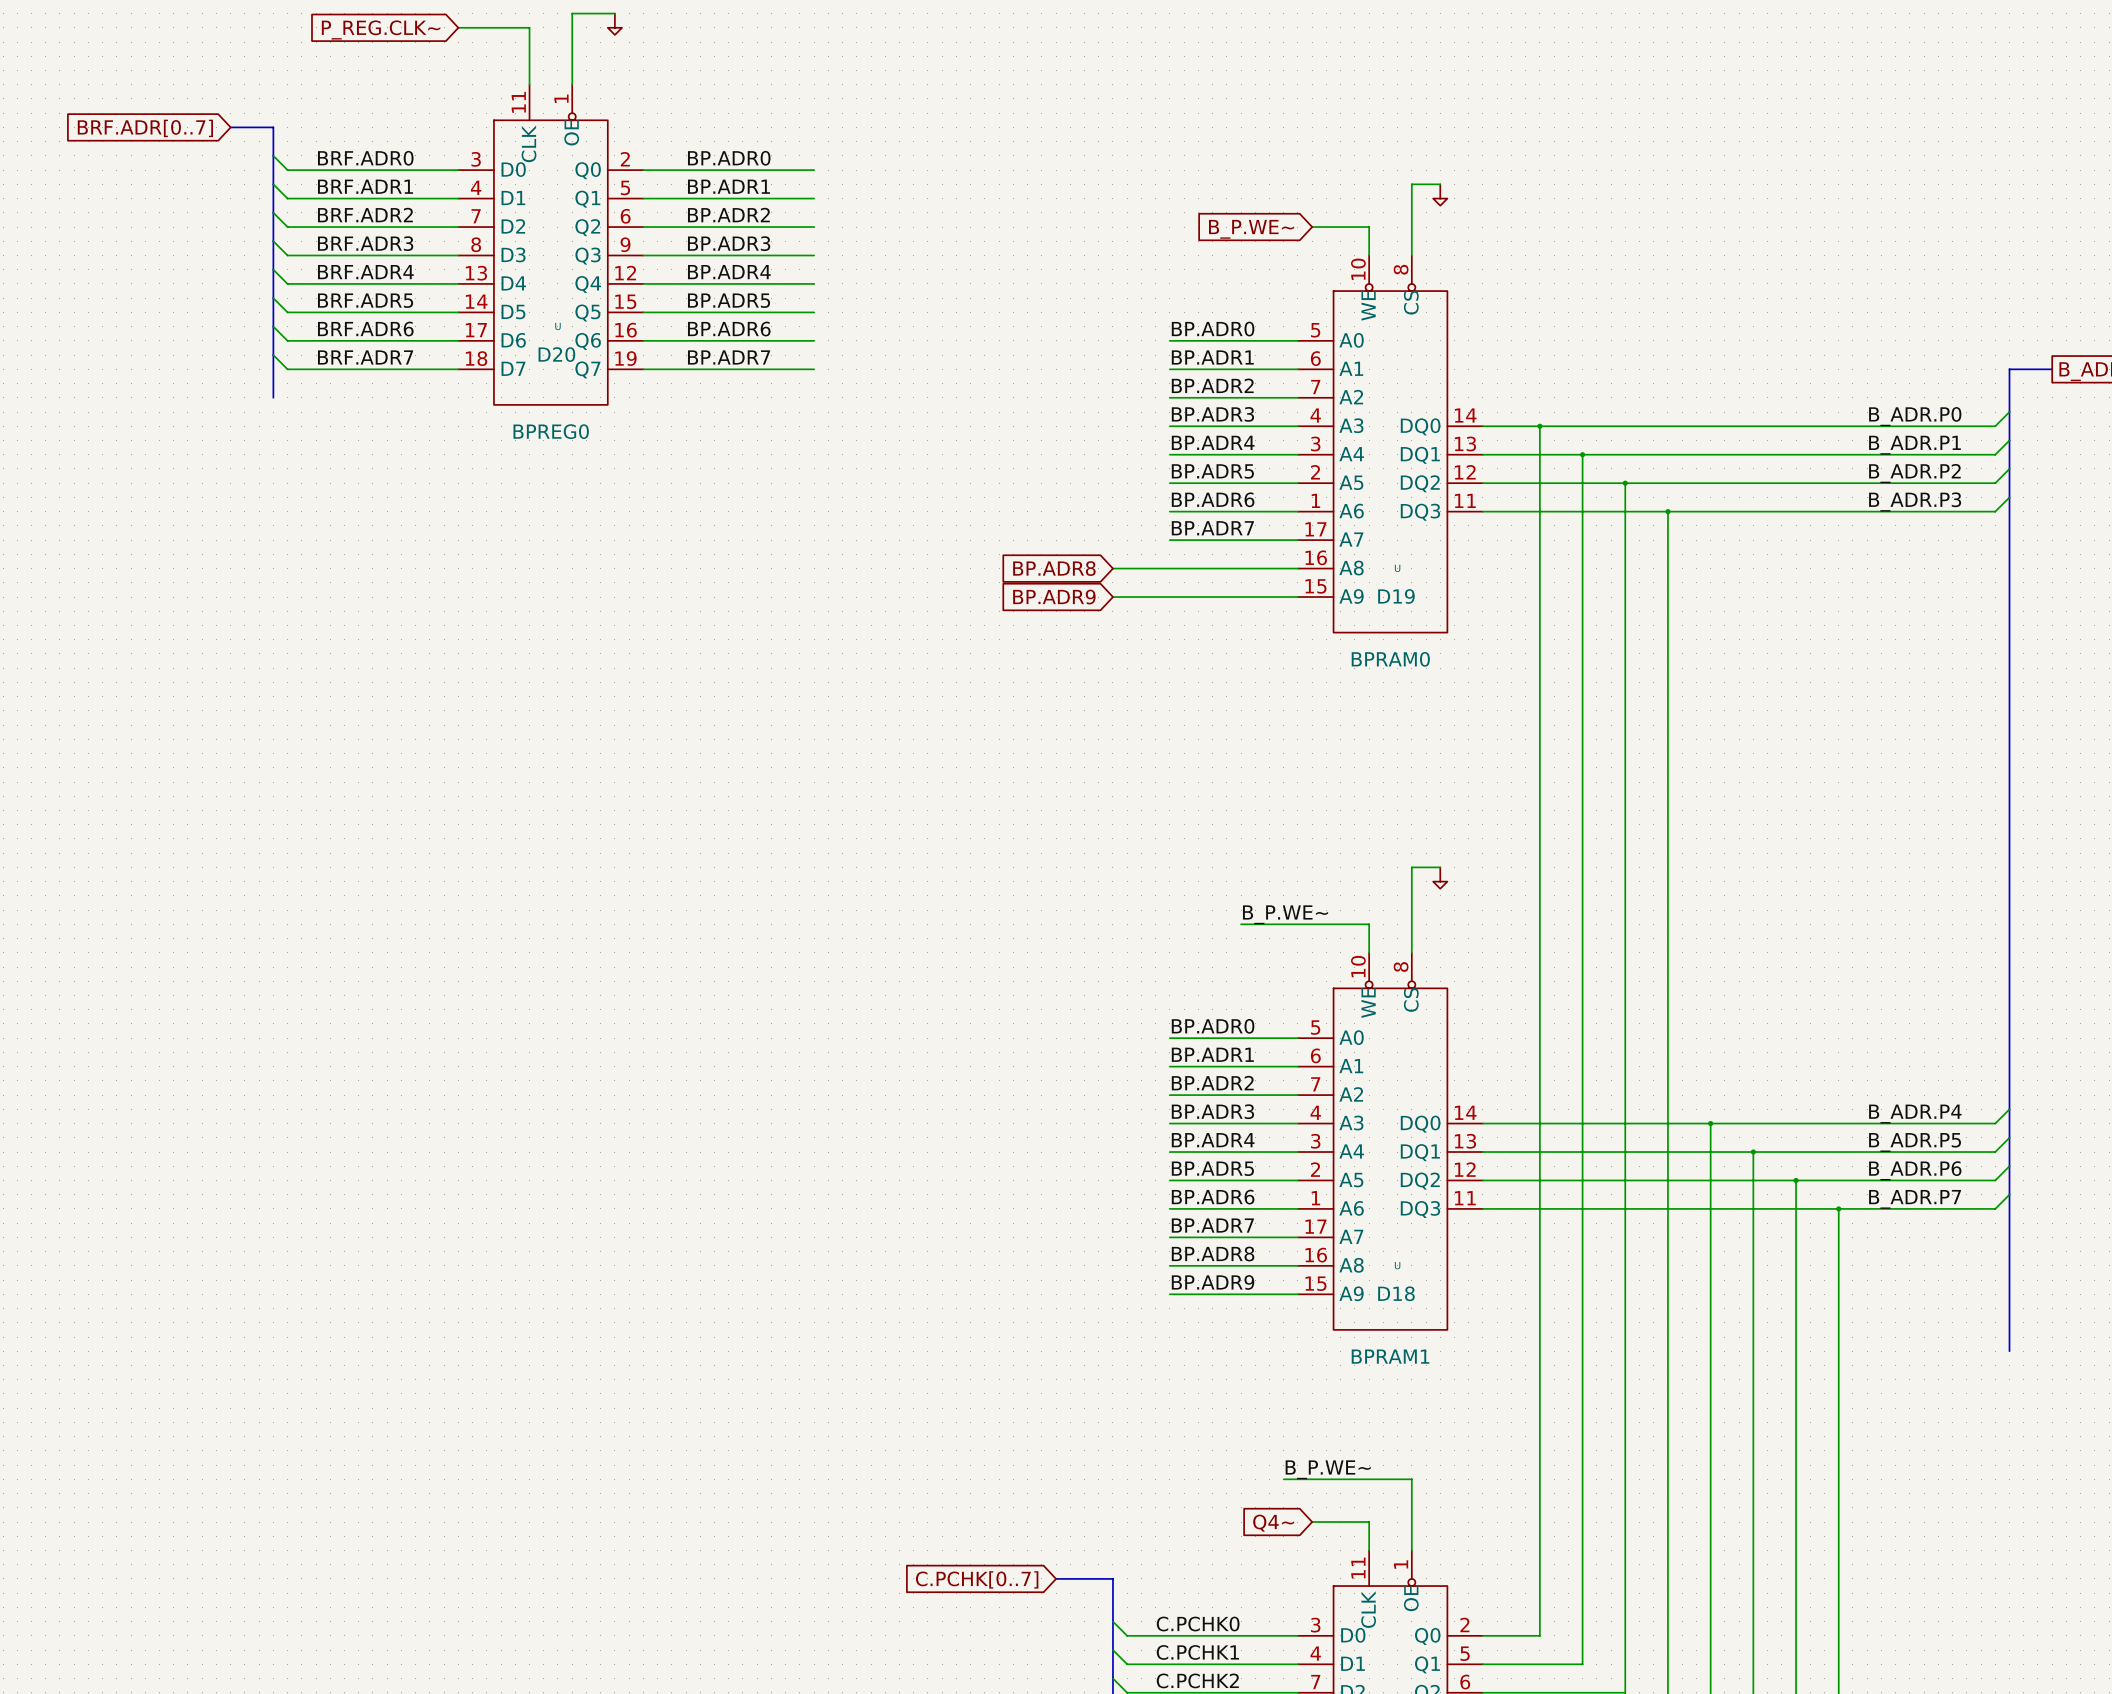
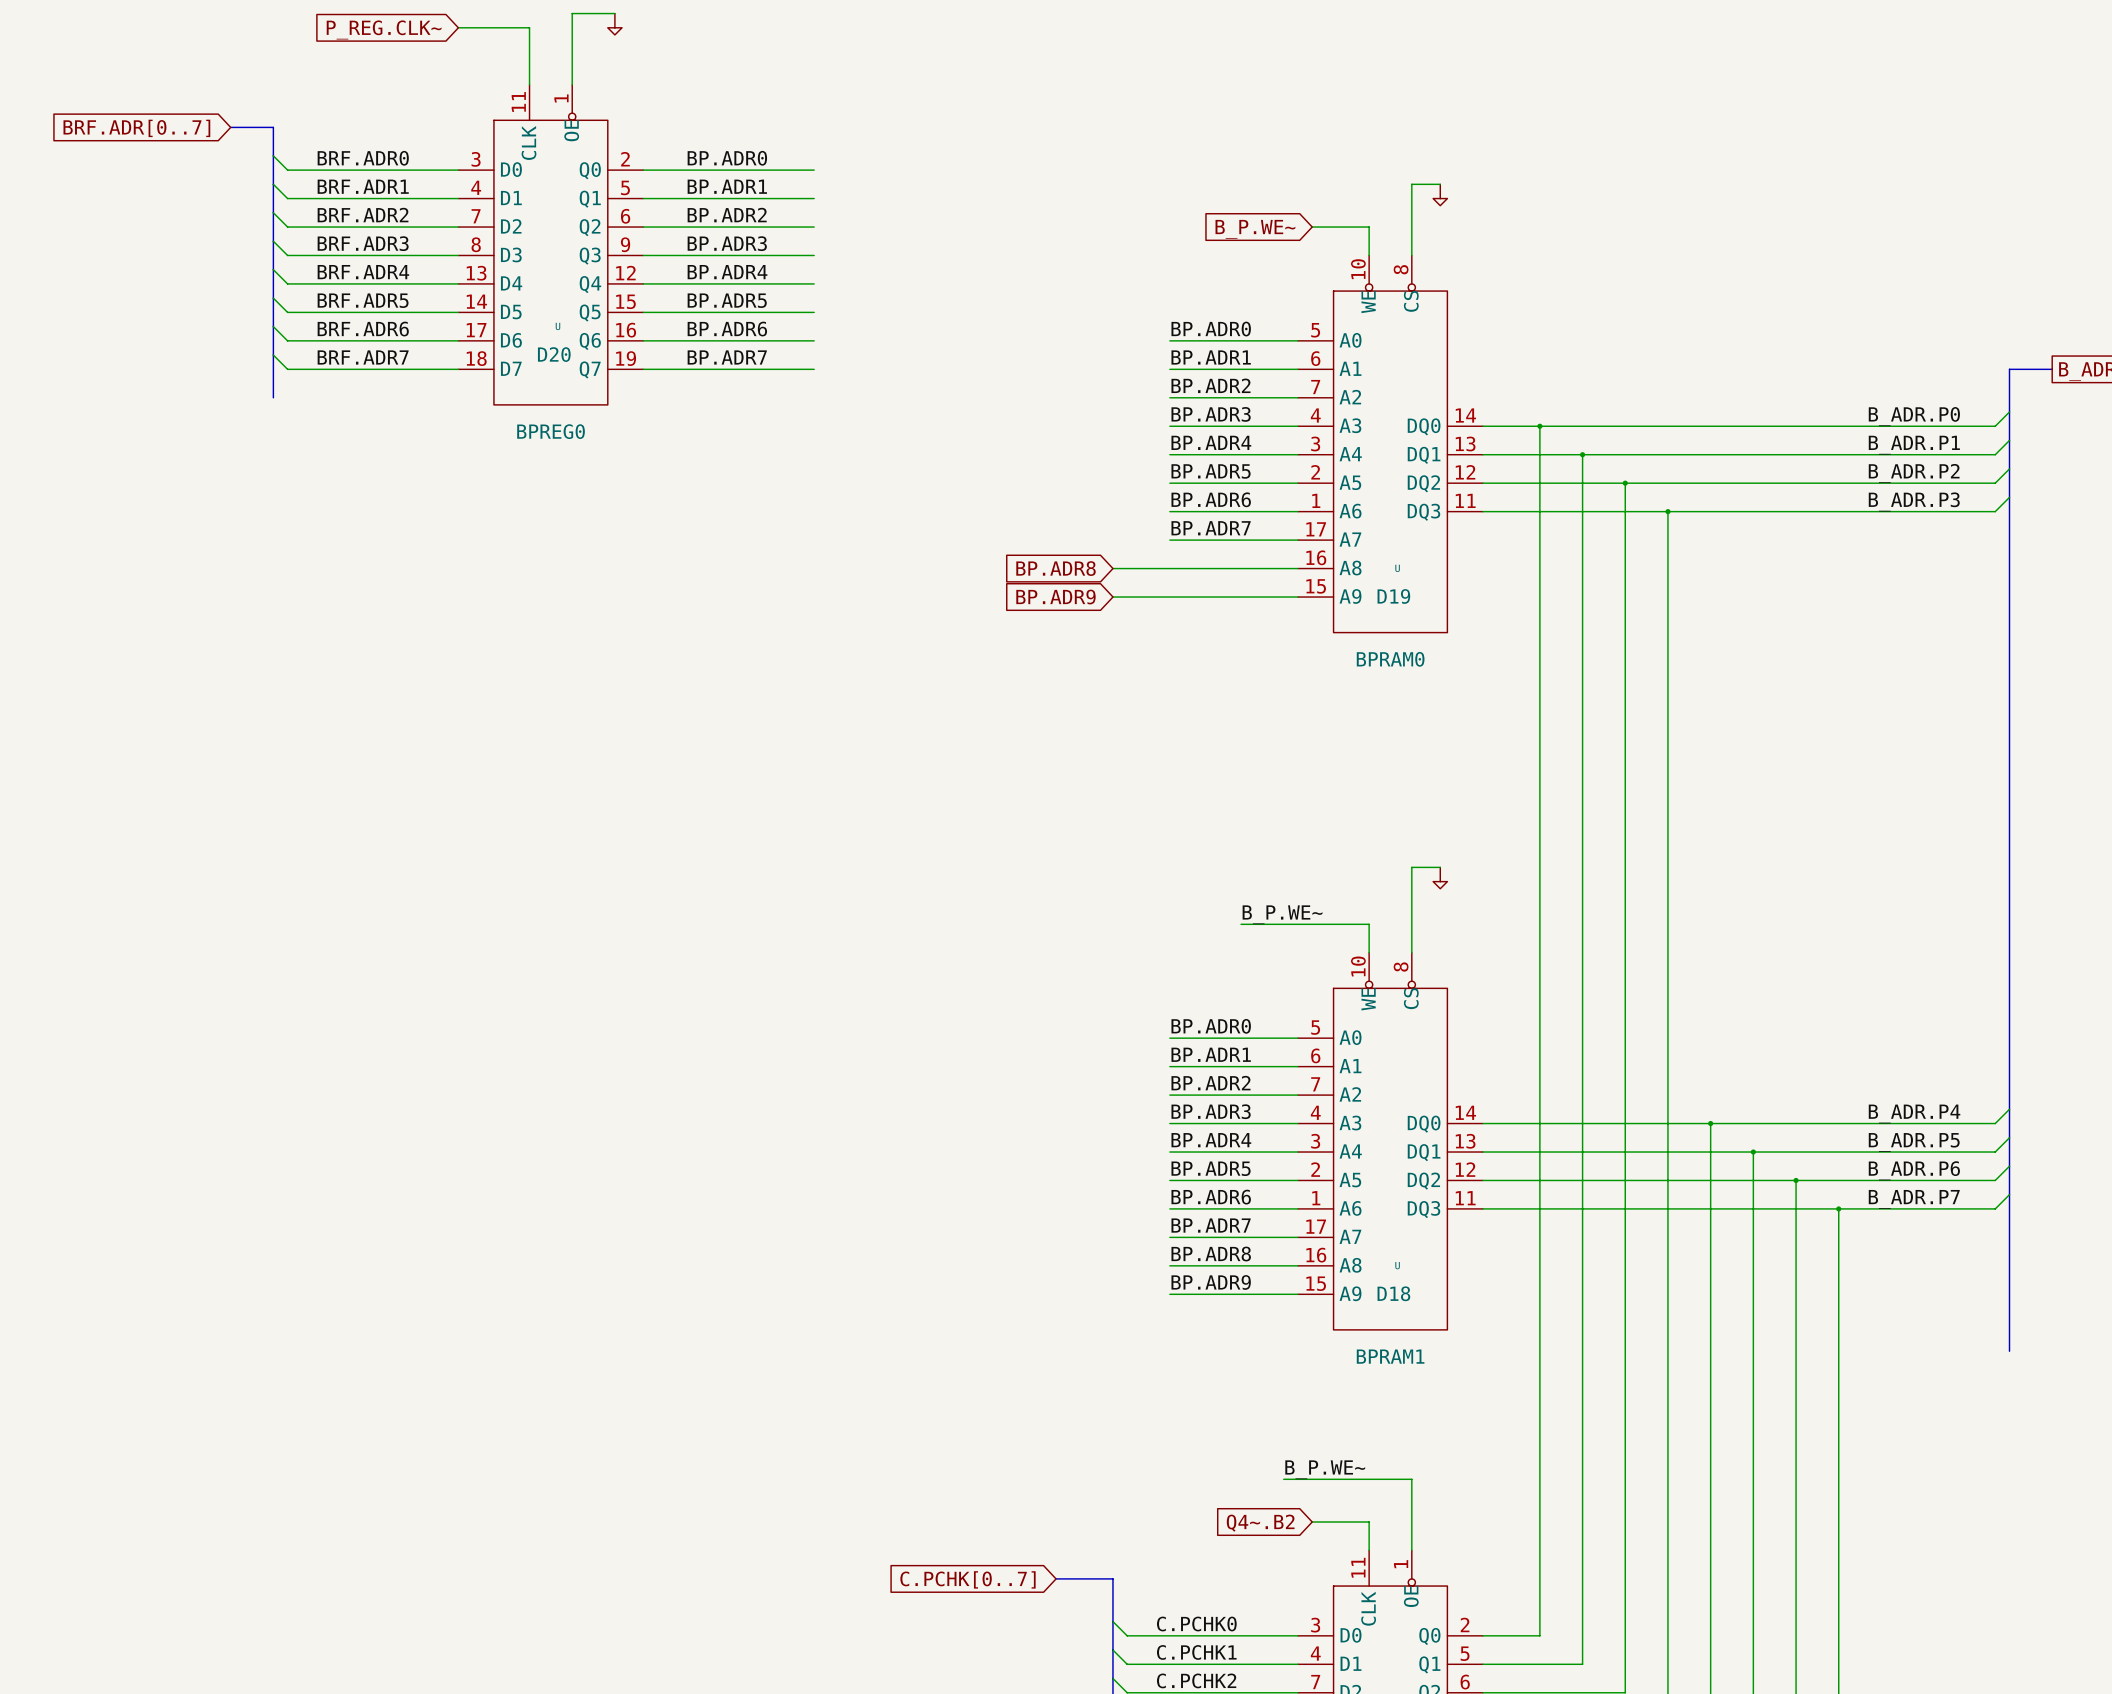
global label: Q4~ (1273, 1523) -> Q4~.B2 (1260, 1523)

